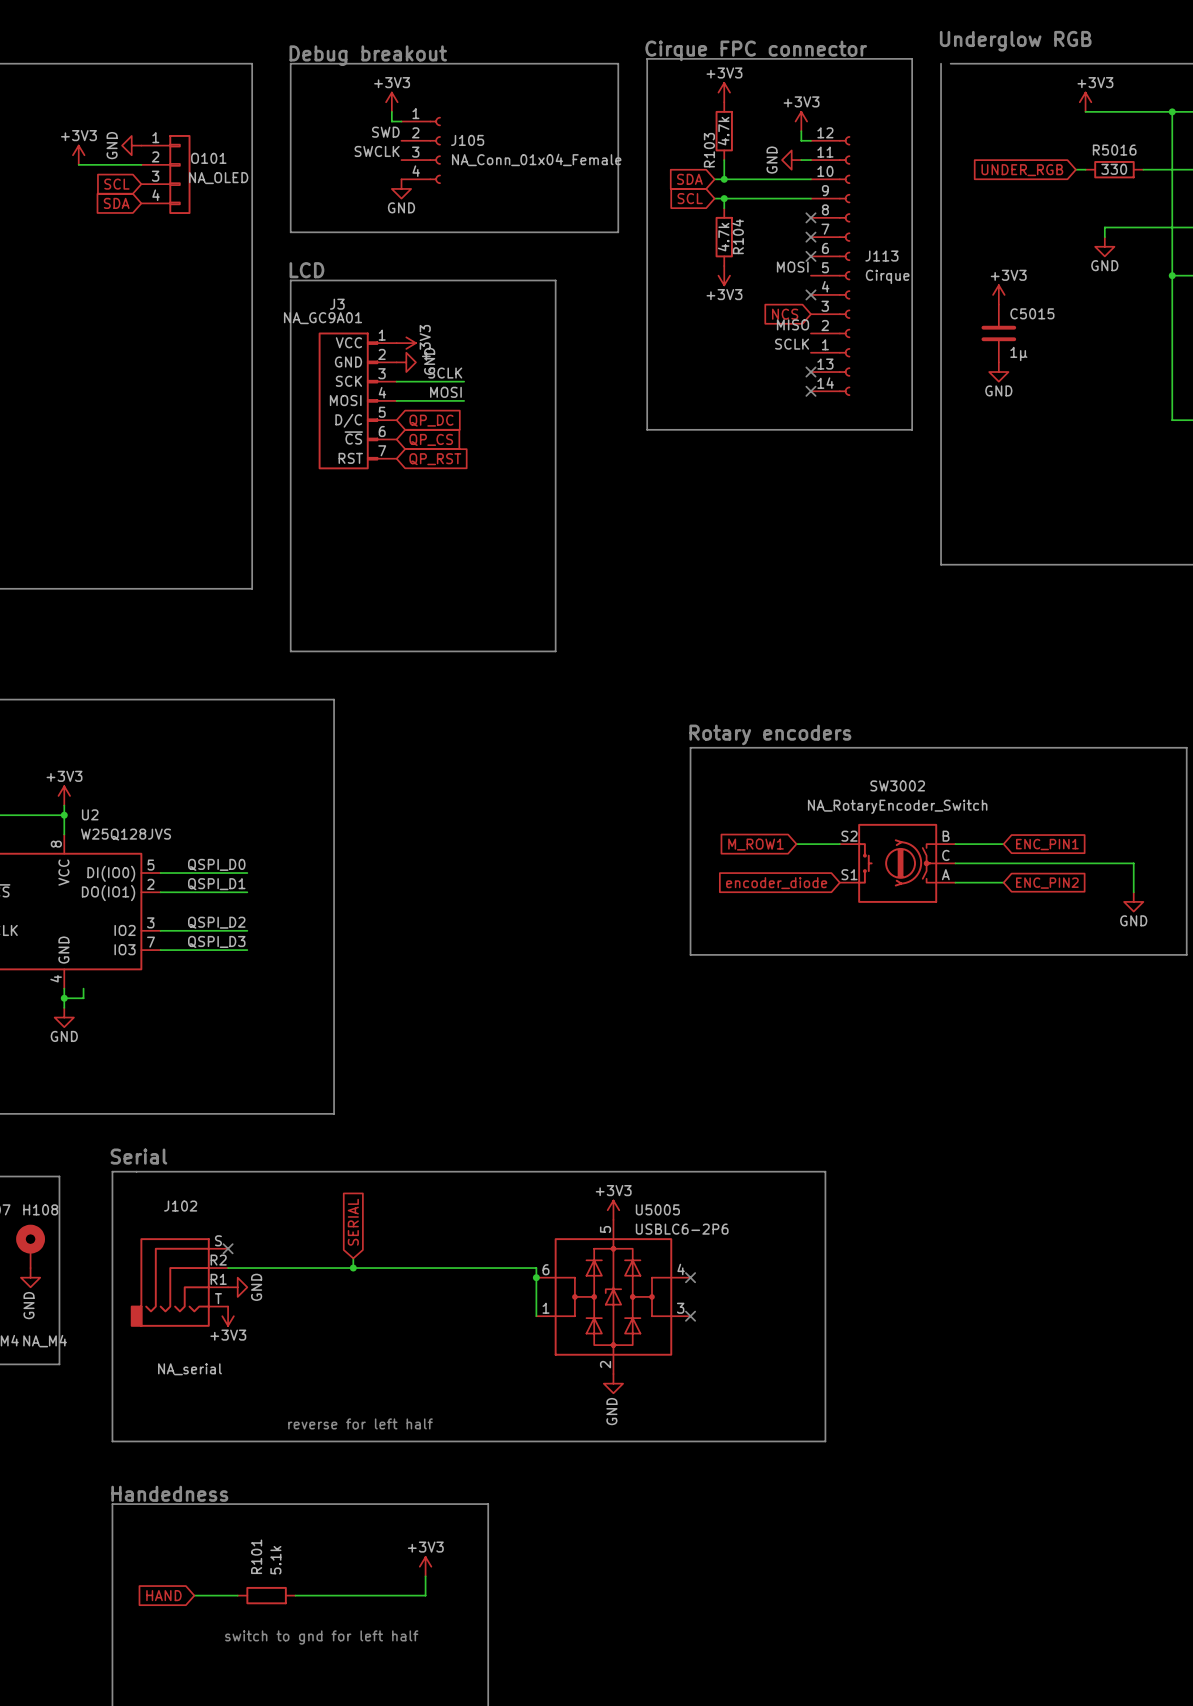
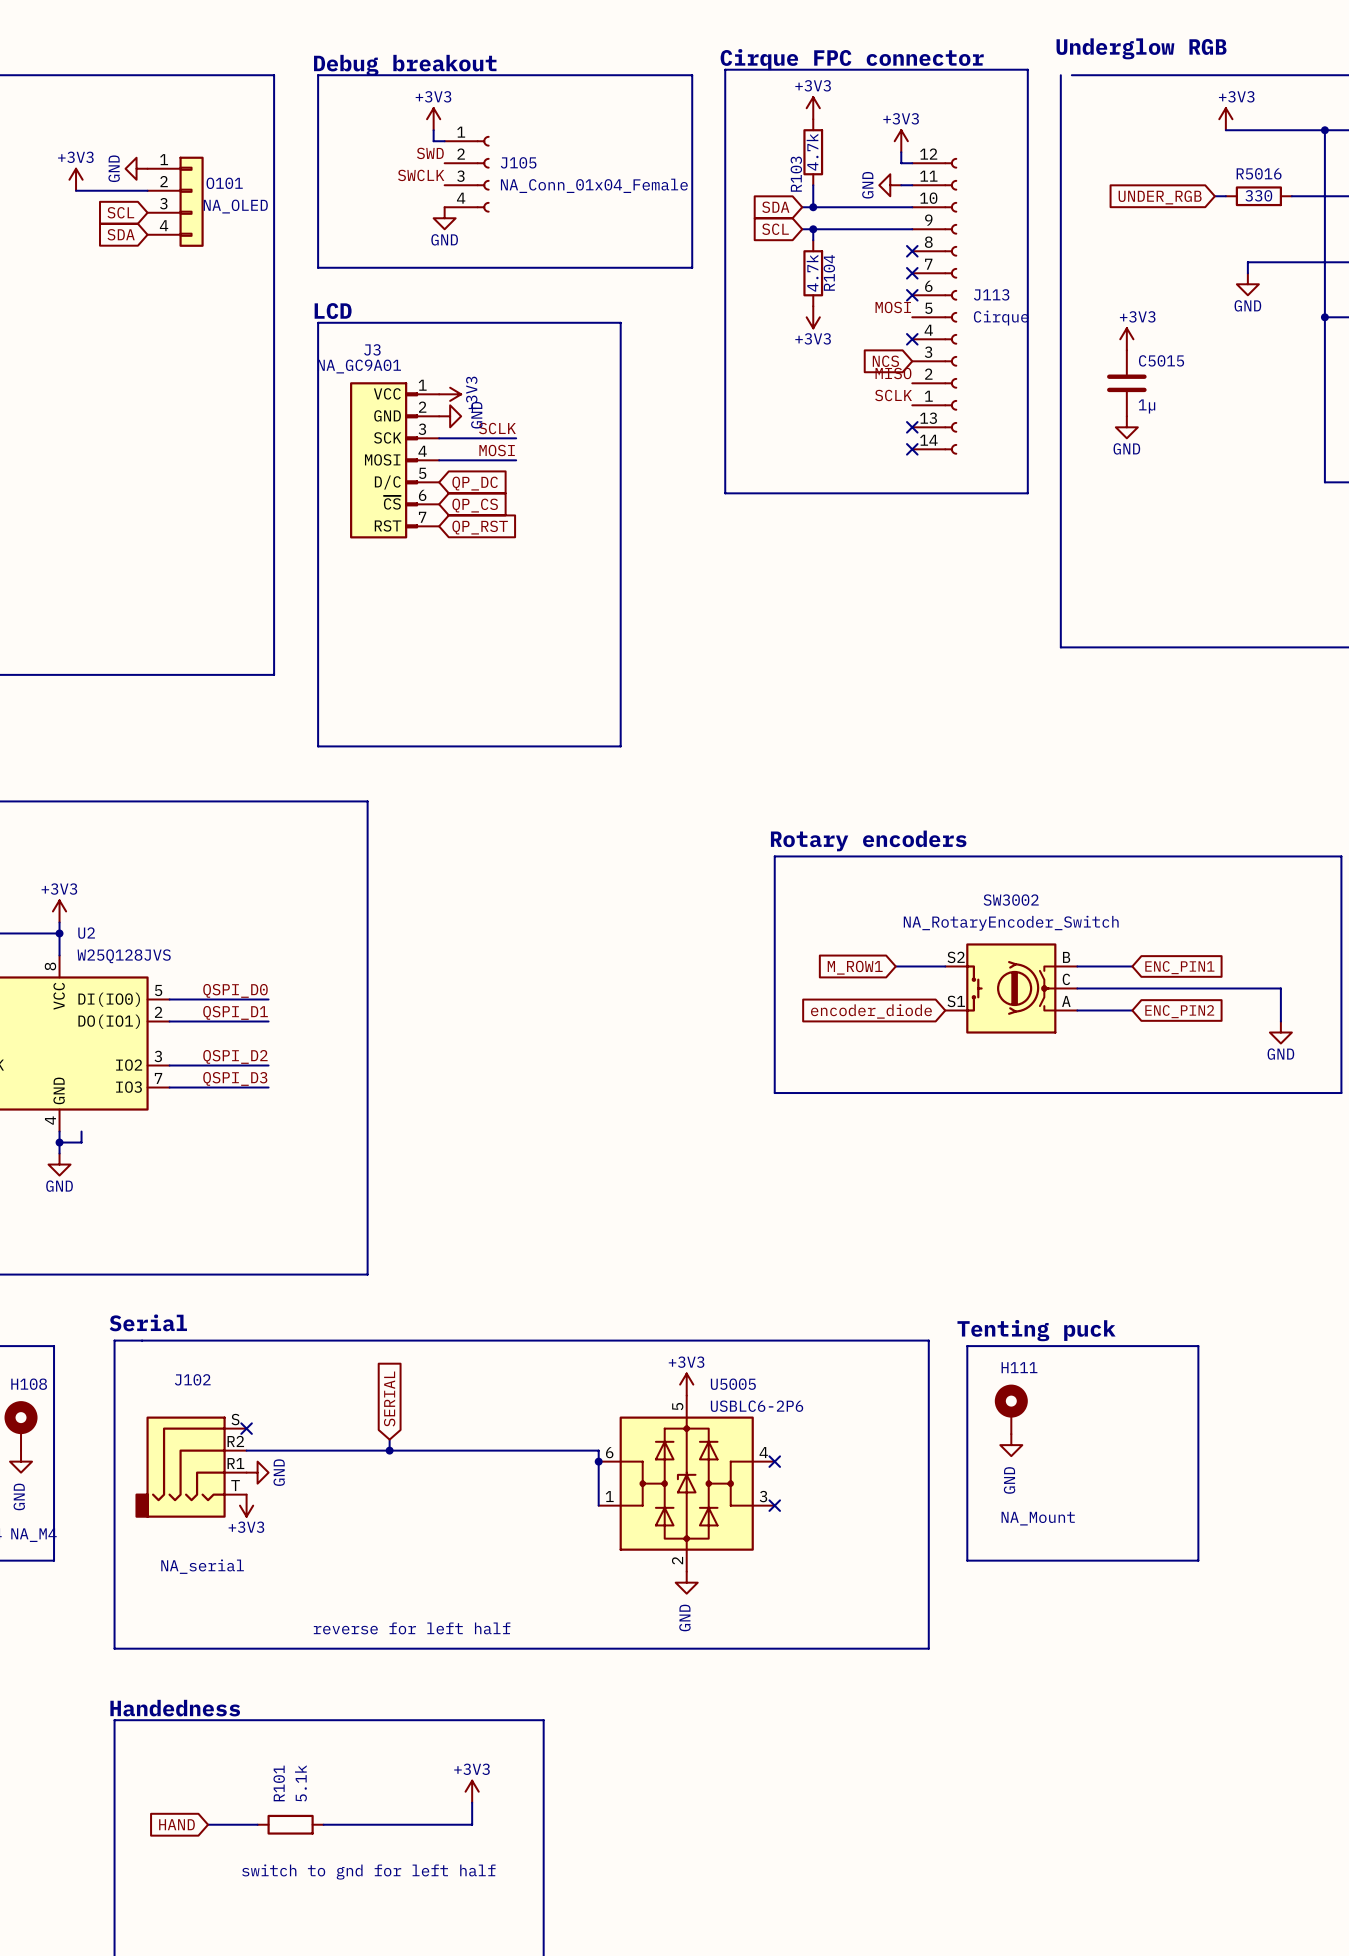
text: none -> Tenting puck (1036, 1330)
line: none -> (967, 1346) (967, 1560) (1198, 1560) (1198, 1346) (967, 1346)
H111: none -> NA_Mount (1011, 1409)
power symbol: none -> GND (1011, 1445)

